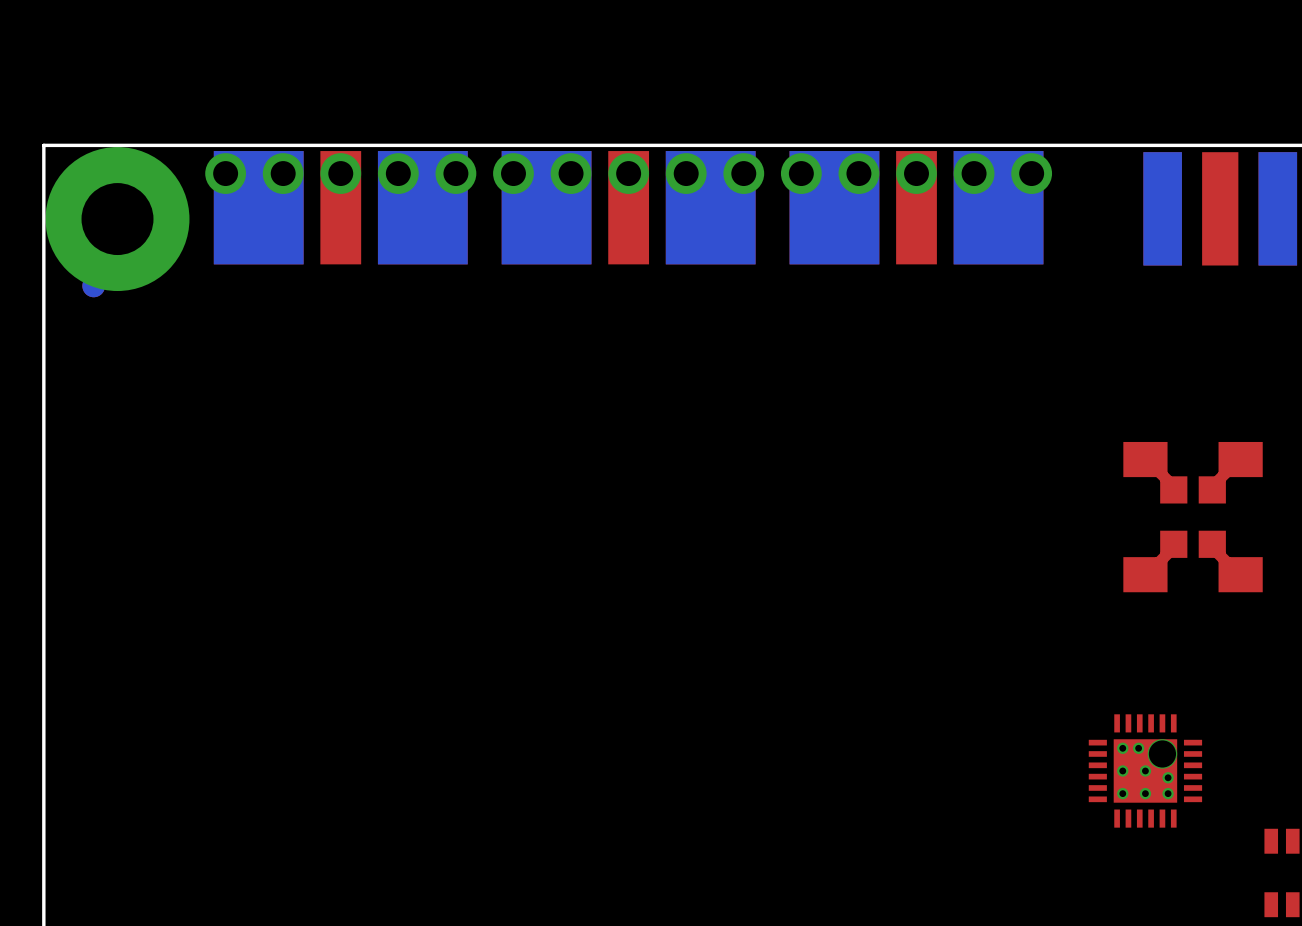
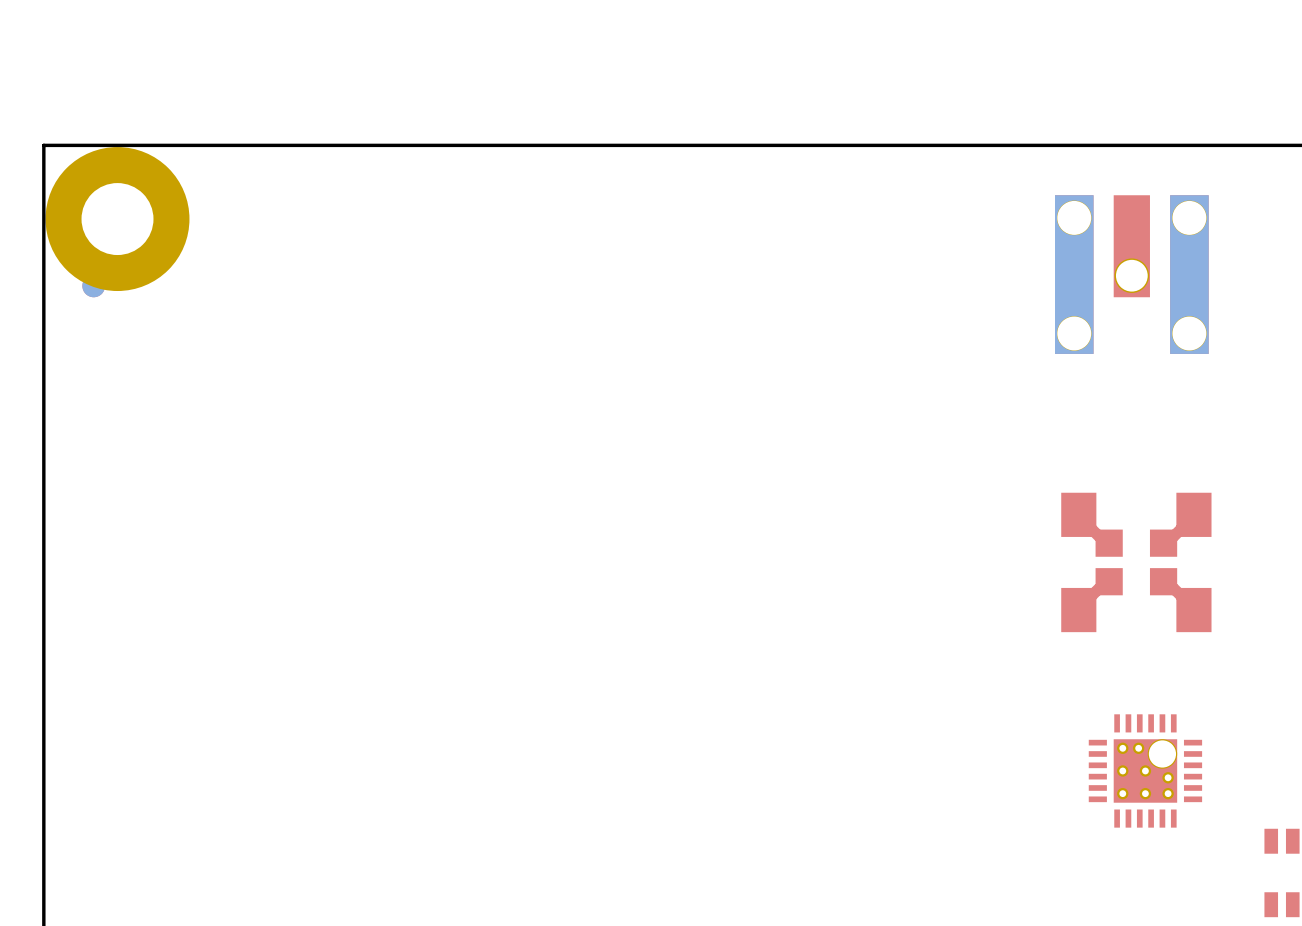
part: (340, 207) -> none
part: (628, 207) -> none
part: (916, 207) -> none
part: (1220, 208) -> none
part: none -> (1131, 274)
part rotation: 0° (1193, 517) -> 90° clockwise (1136, 562)

